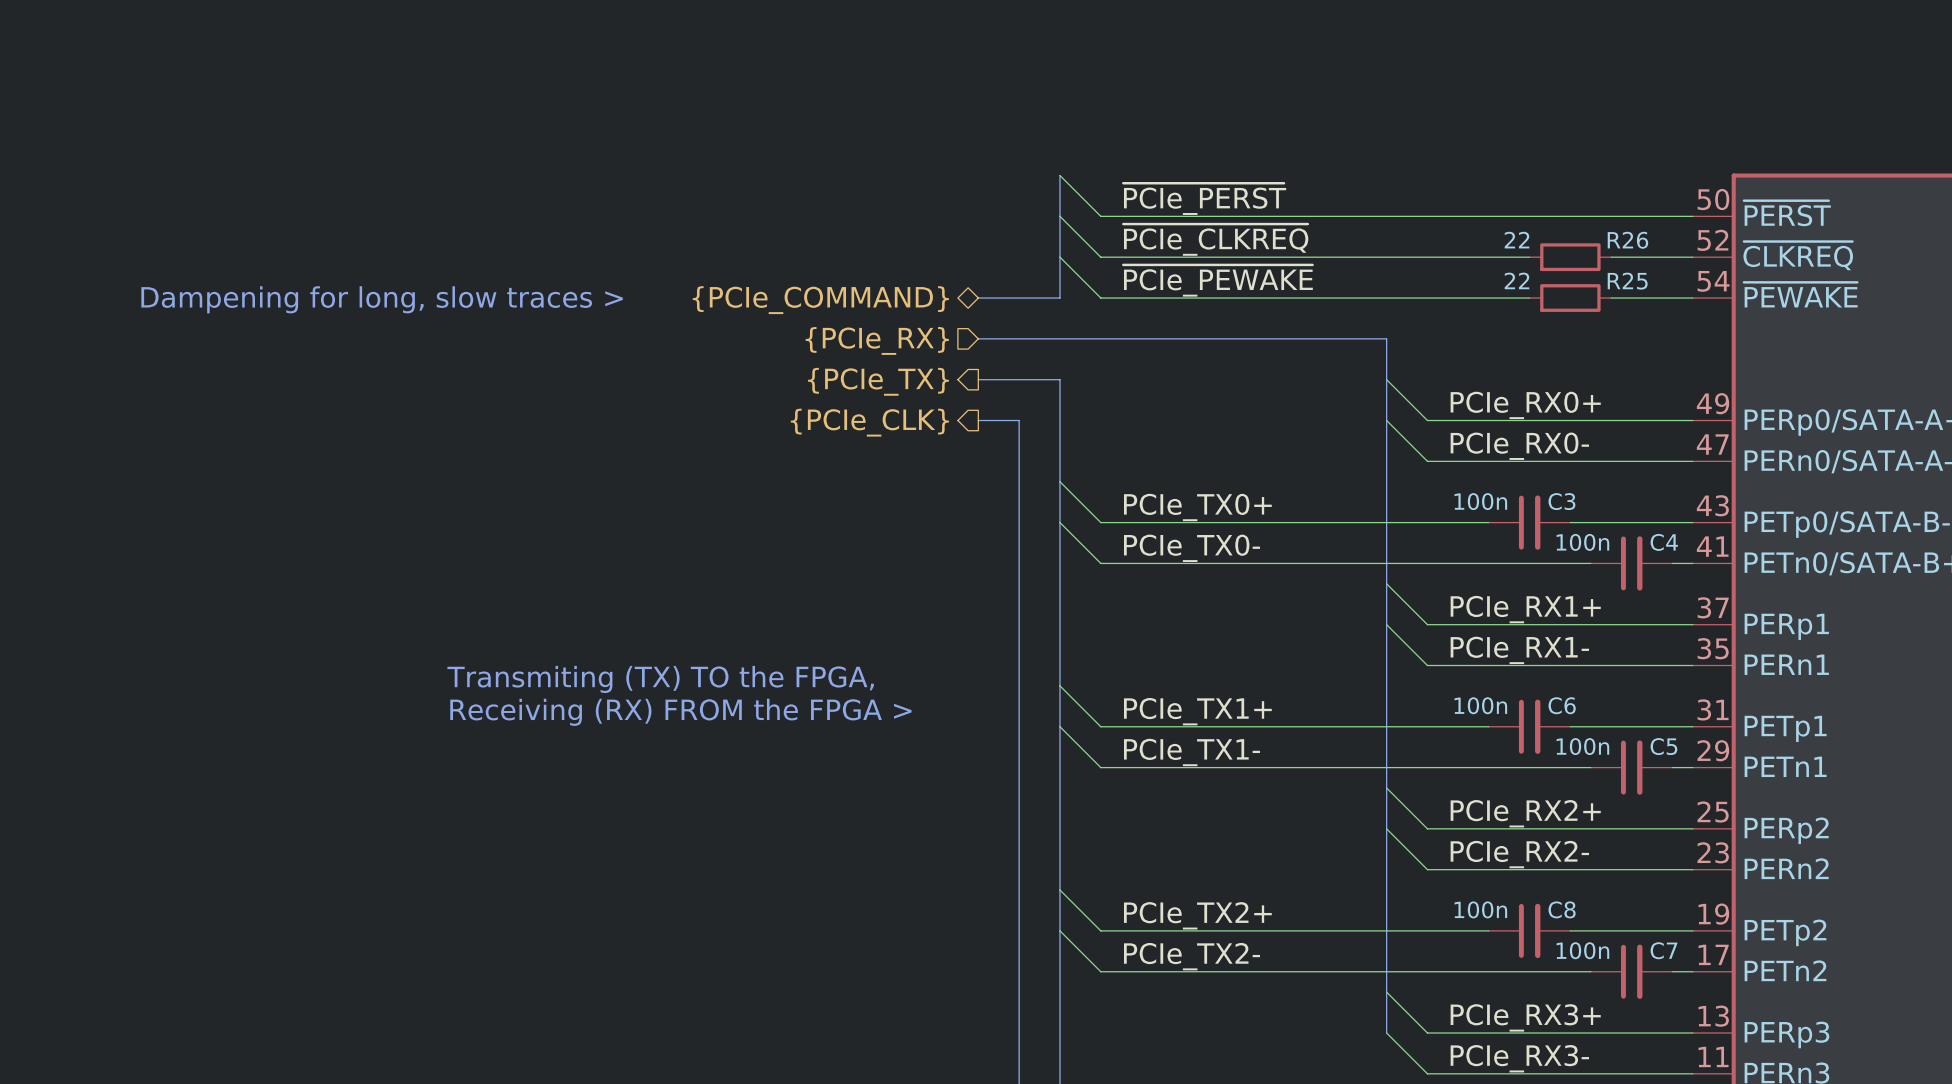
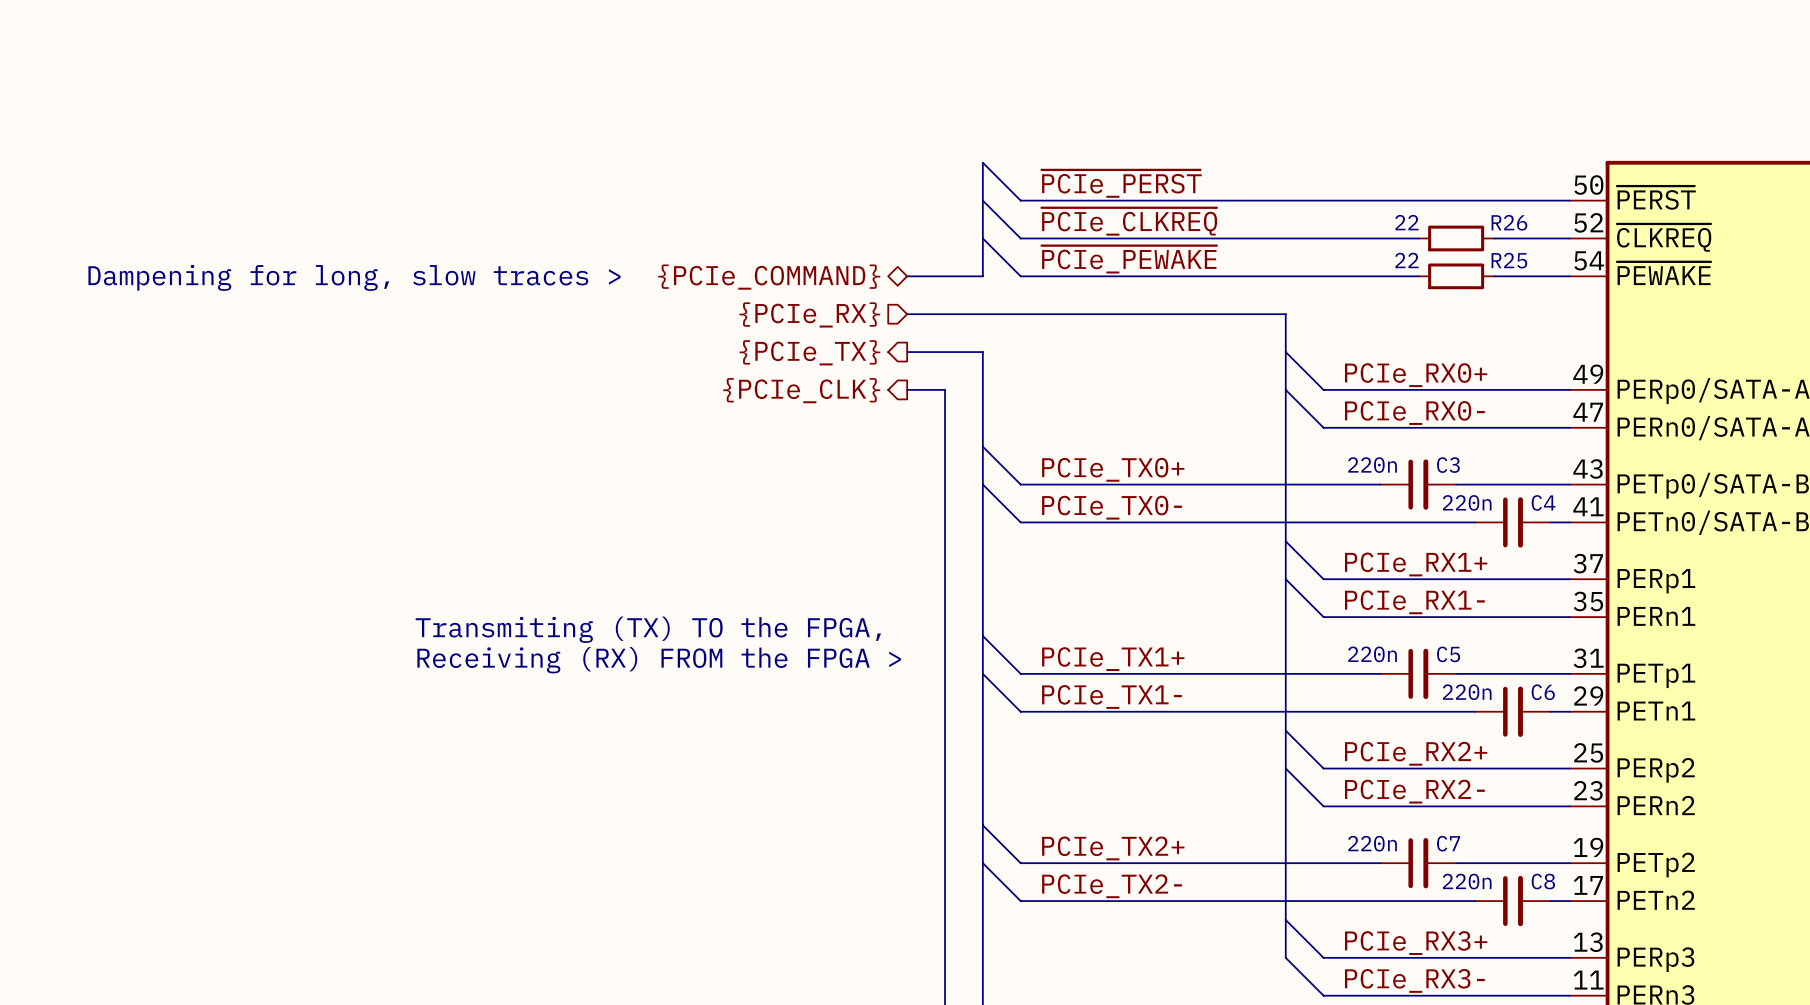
C3 value: 100n (1480, 501) -> 220n (1372, 465)
C4 value: 100n (1582, 542) -> 220n (1467, 502)
C6 value: 100n (1480, 705) -> 220n (1372, 654)
C6 name: C6 (1562, 705) -> C5 (1448, 654)
C5 value: 100n (1582, 746) -> 220n (1467, 692)
C5 name: C5 (1663, 746) -> C6 (1543, 692)
C8 value: 100n (1480, 909) -> 220n (1372, 843)
C8 name: C8 (1562, 909) -> C7 (1448, 843)
C7 value: 100n (1582, 950) -> 220n (1467, 881)
C7 name: C7 (1663, 950) -> C8 (1543, 881)

